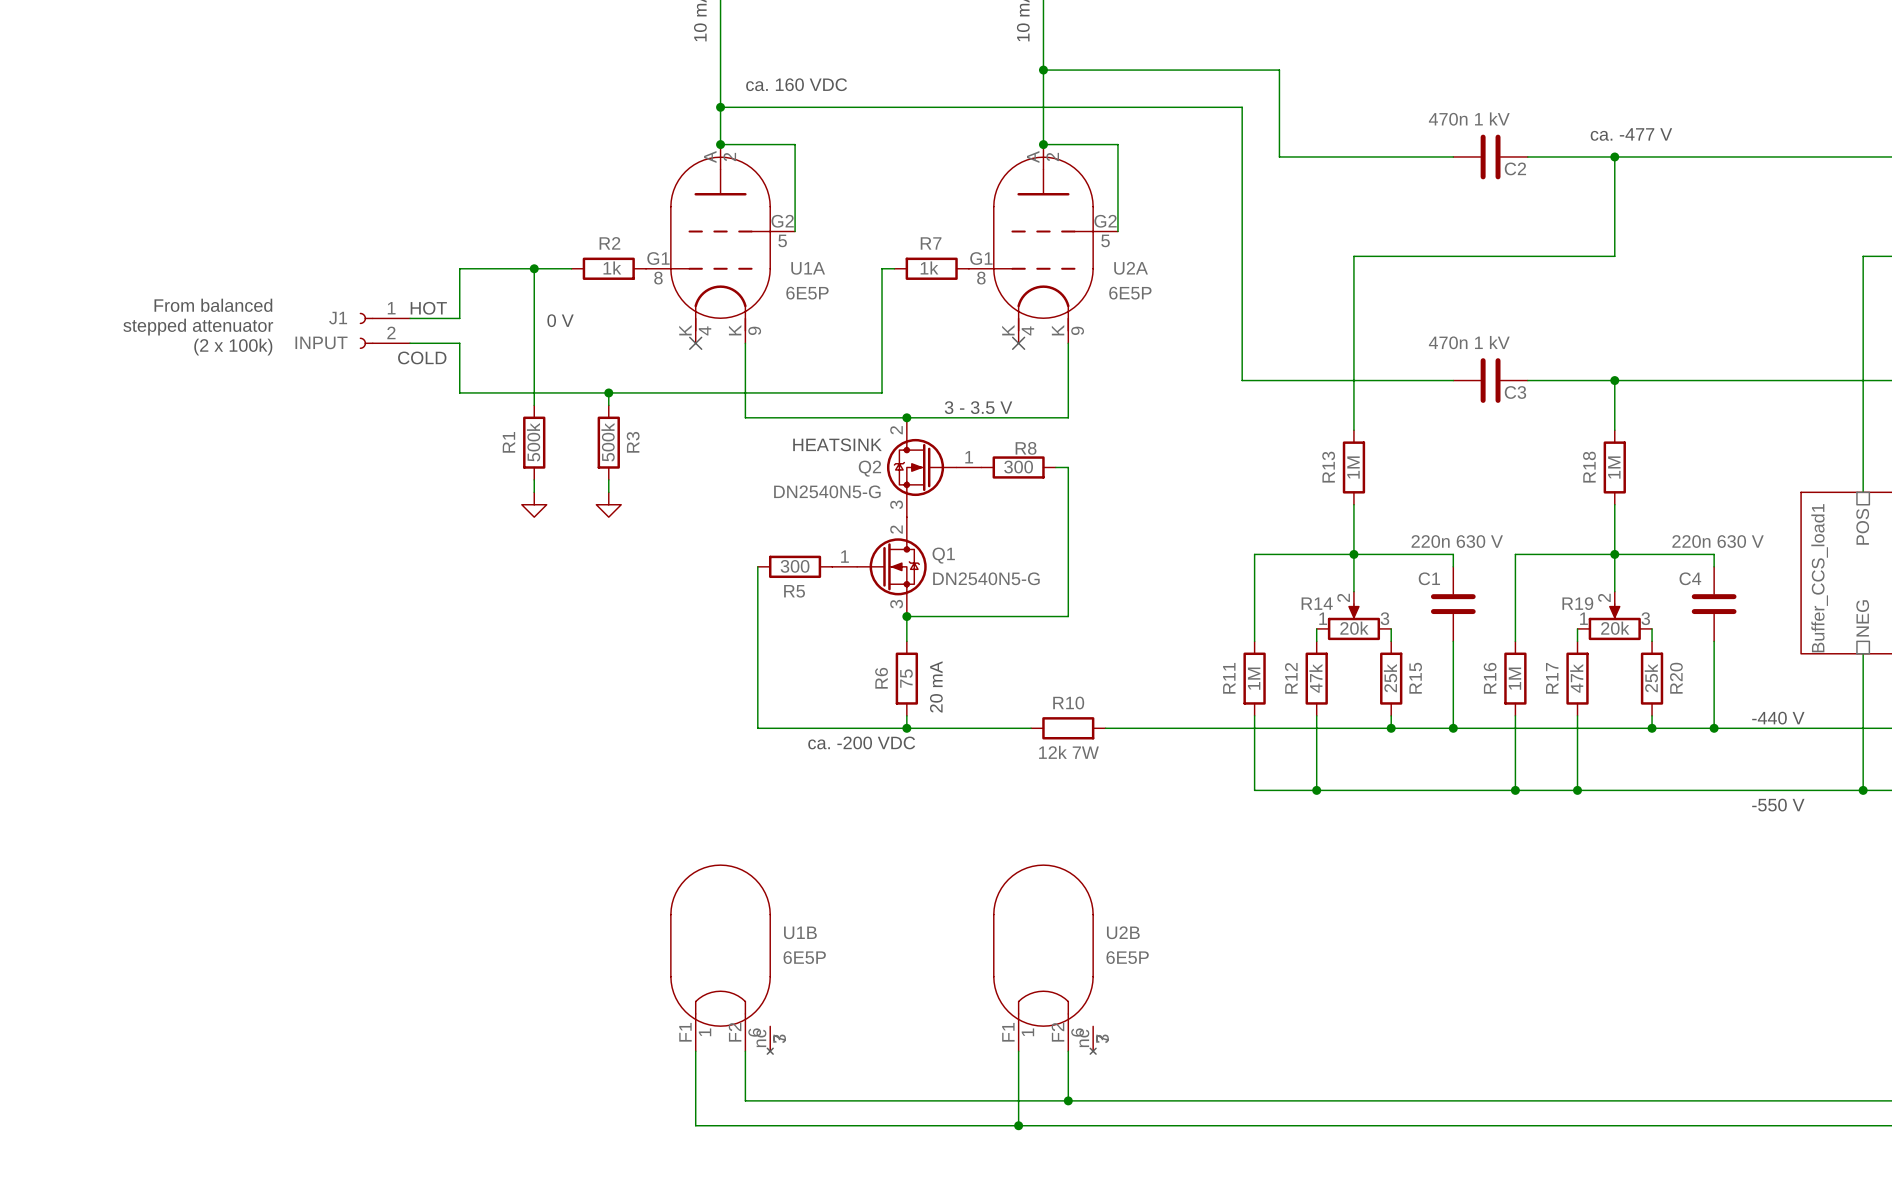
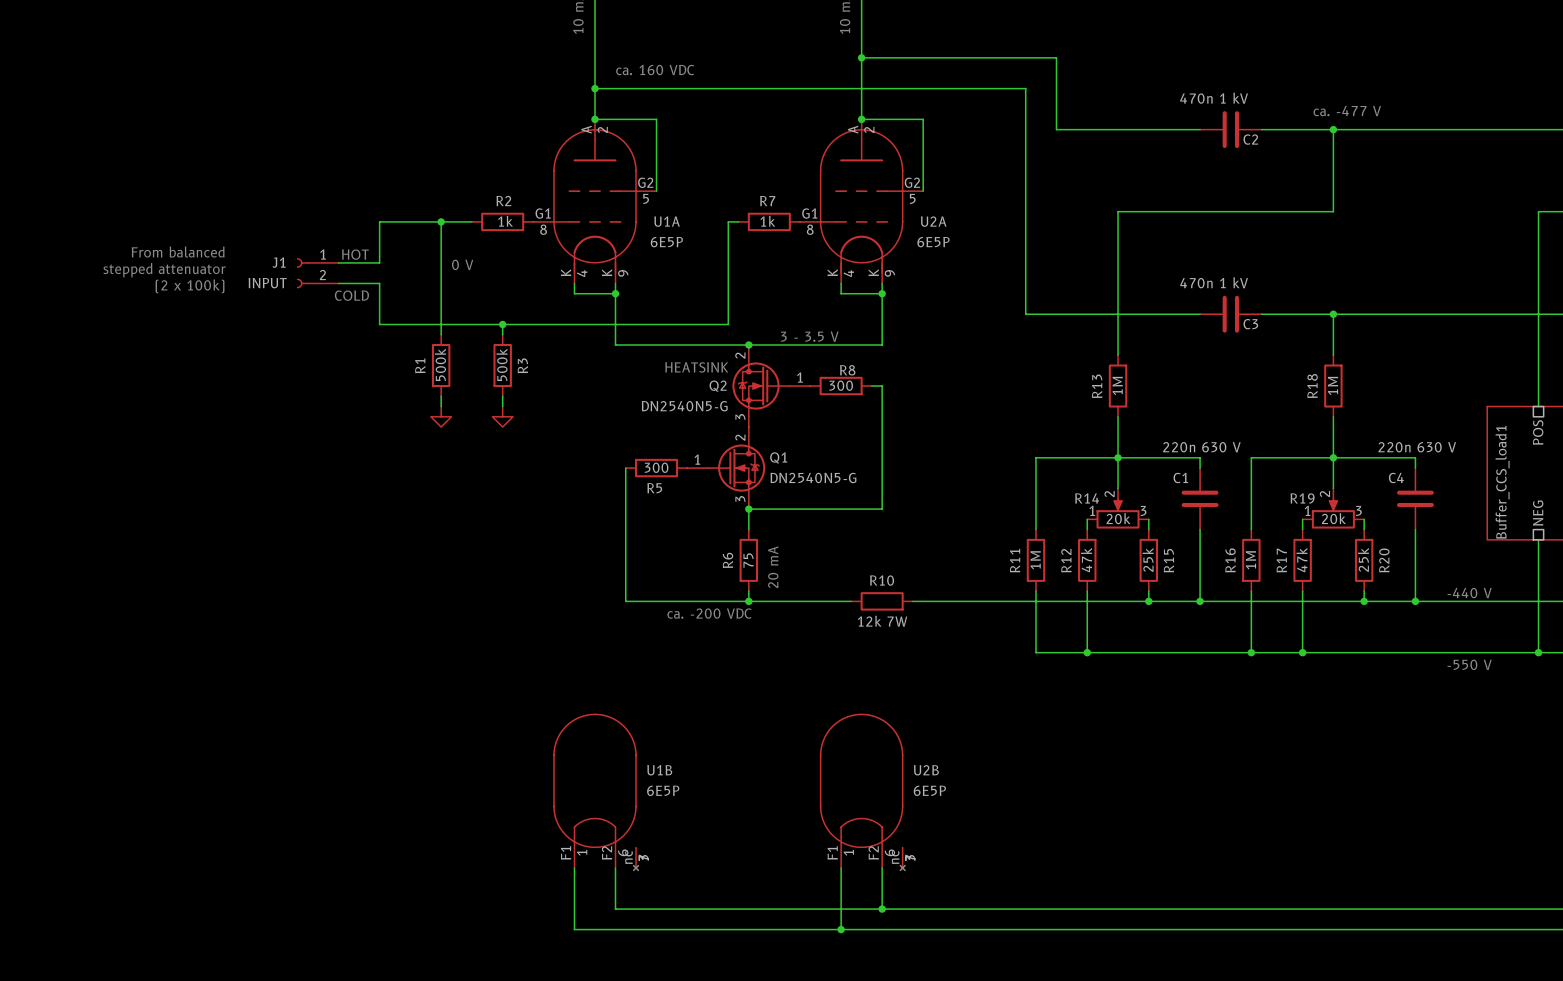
wire: none -> (574, 283) (574, 293) (615, 293)
no-connect mark: (695, 343) -> none
wire: none -> (841, 283) (841, 293) (882, 293)
no-connect mark: (1018, 343) -> none
junction: none -> (615, 293)
junction: none -> (882, 293)

